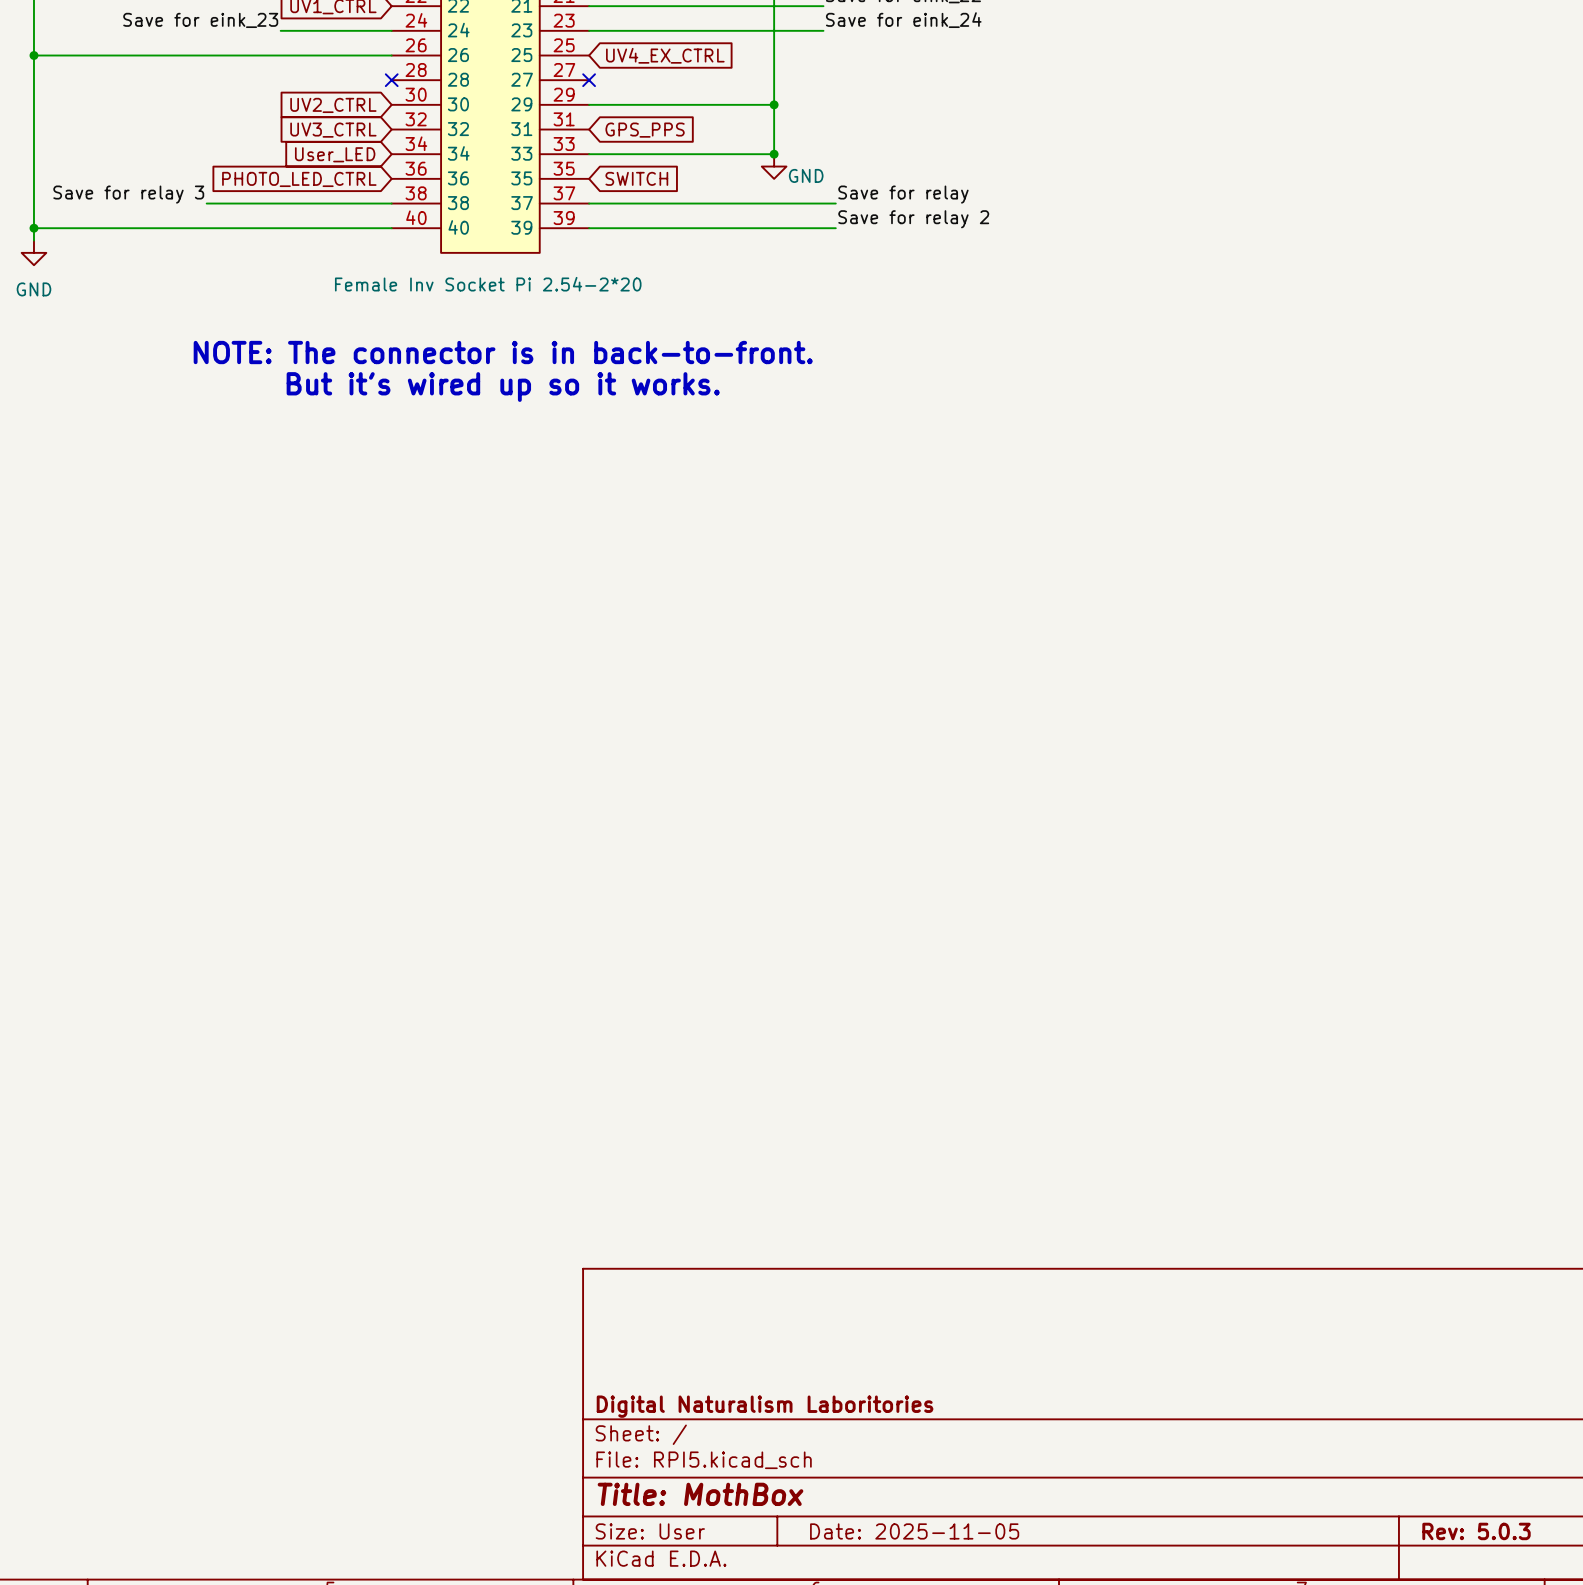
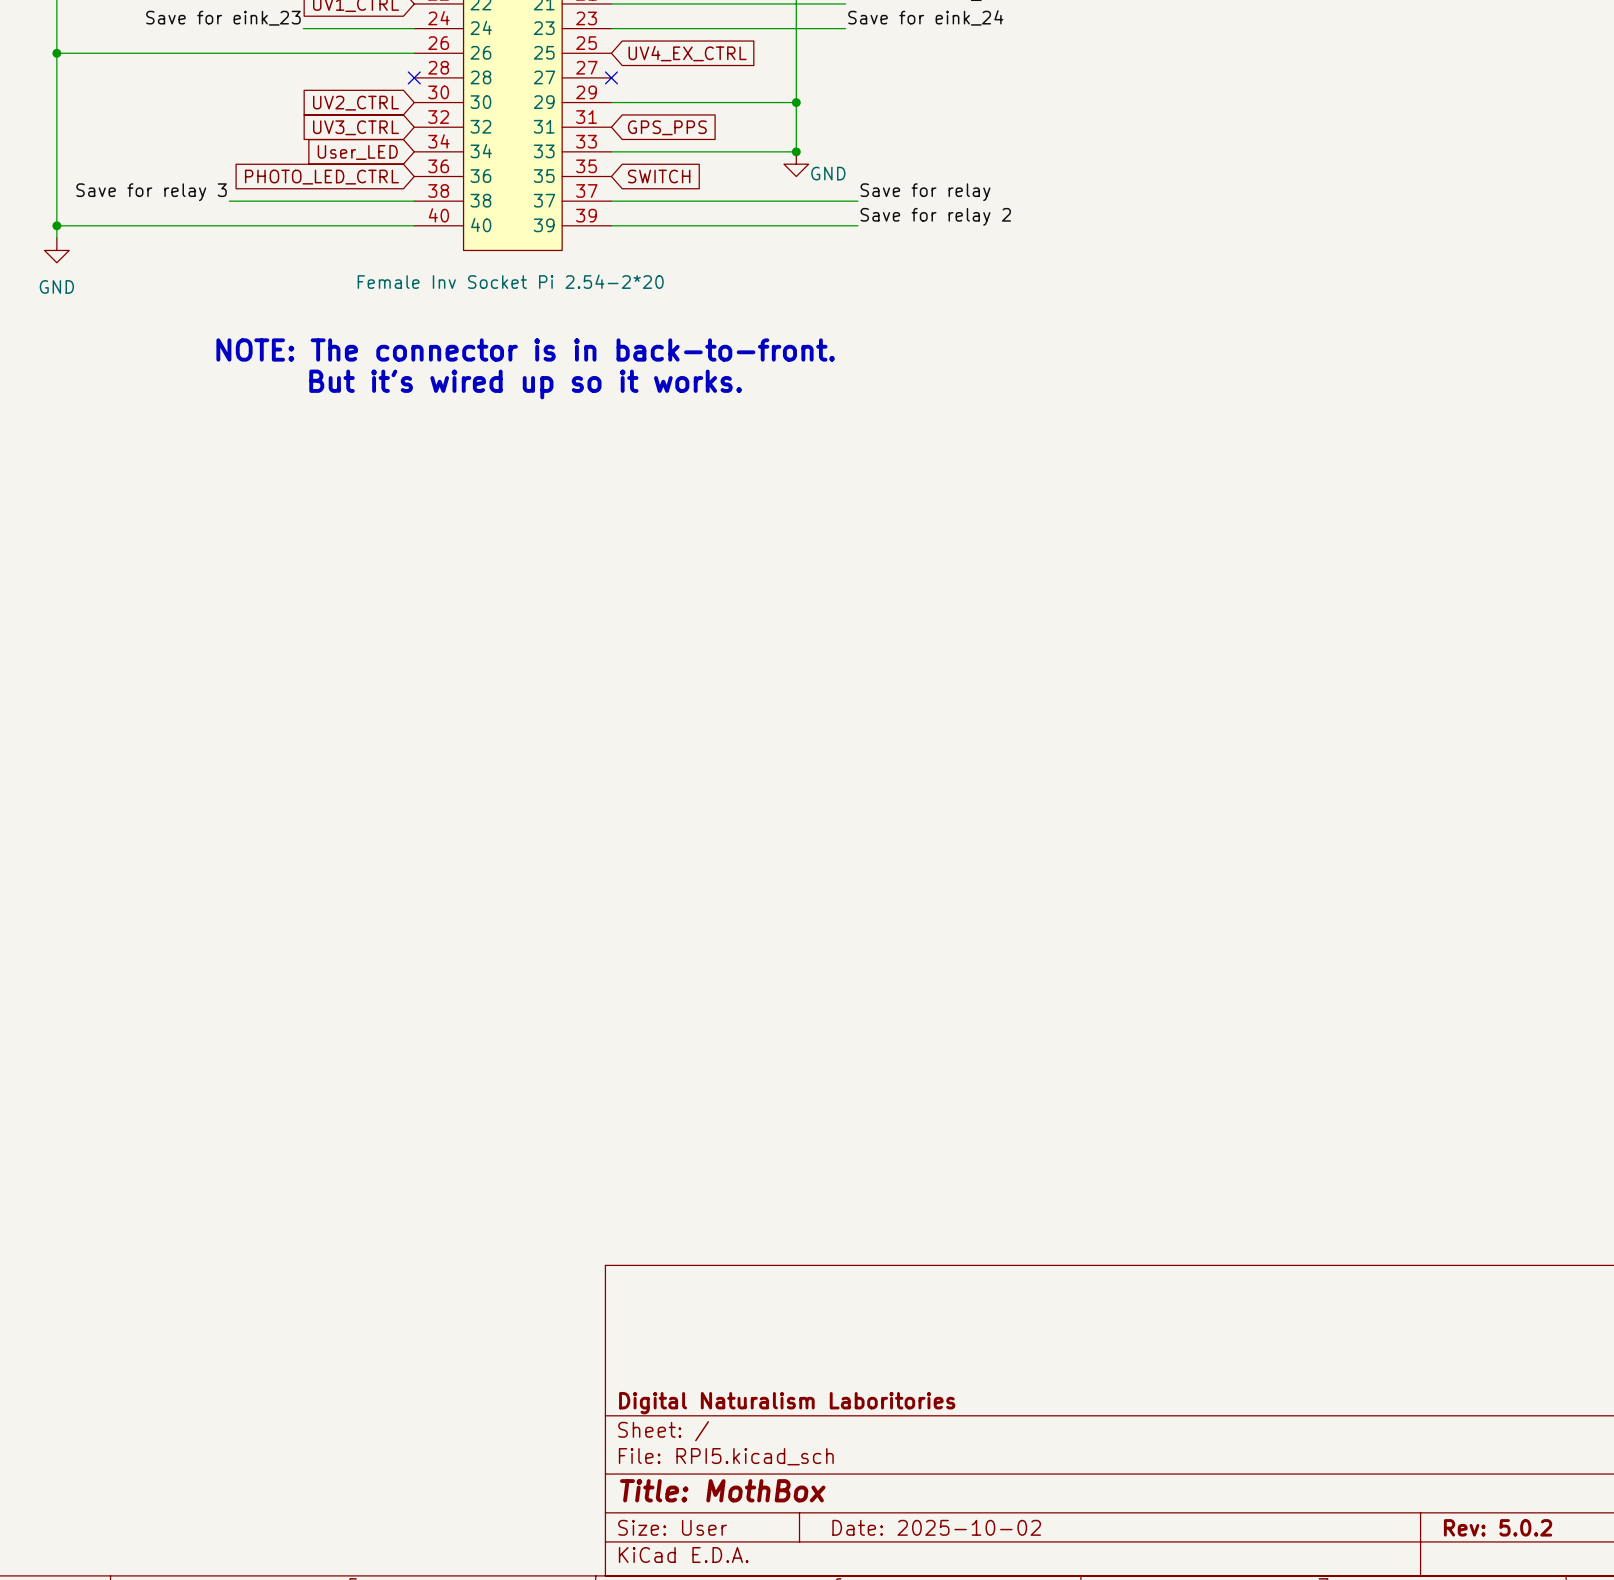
title block: Date: 2025-11-05 (914, 1531) -> Date: 2025-10-02 (936, 1527)
title block: Rev: 5.0.3 (1476, 1531) -> Rev: 5.0.2 (1498, 1527)

